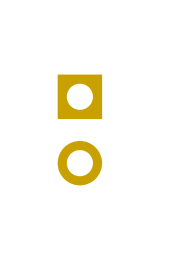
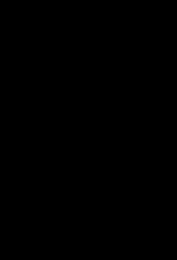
part: (79, 129) -> none

